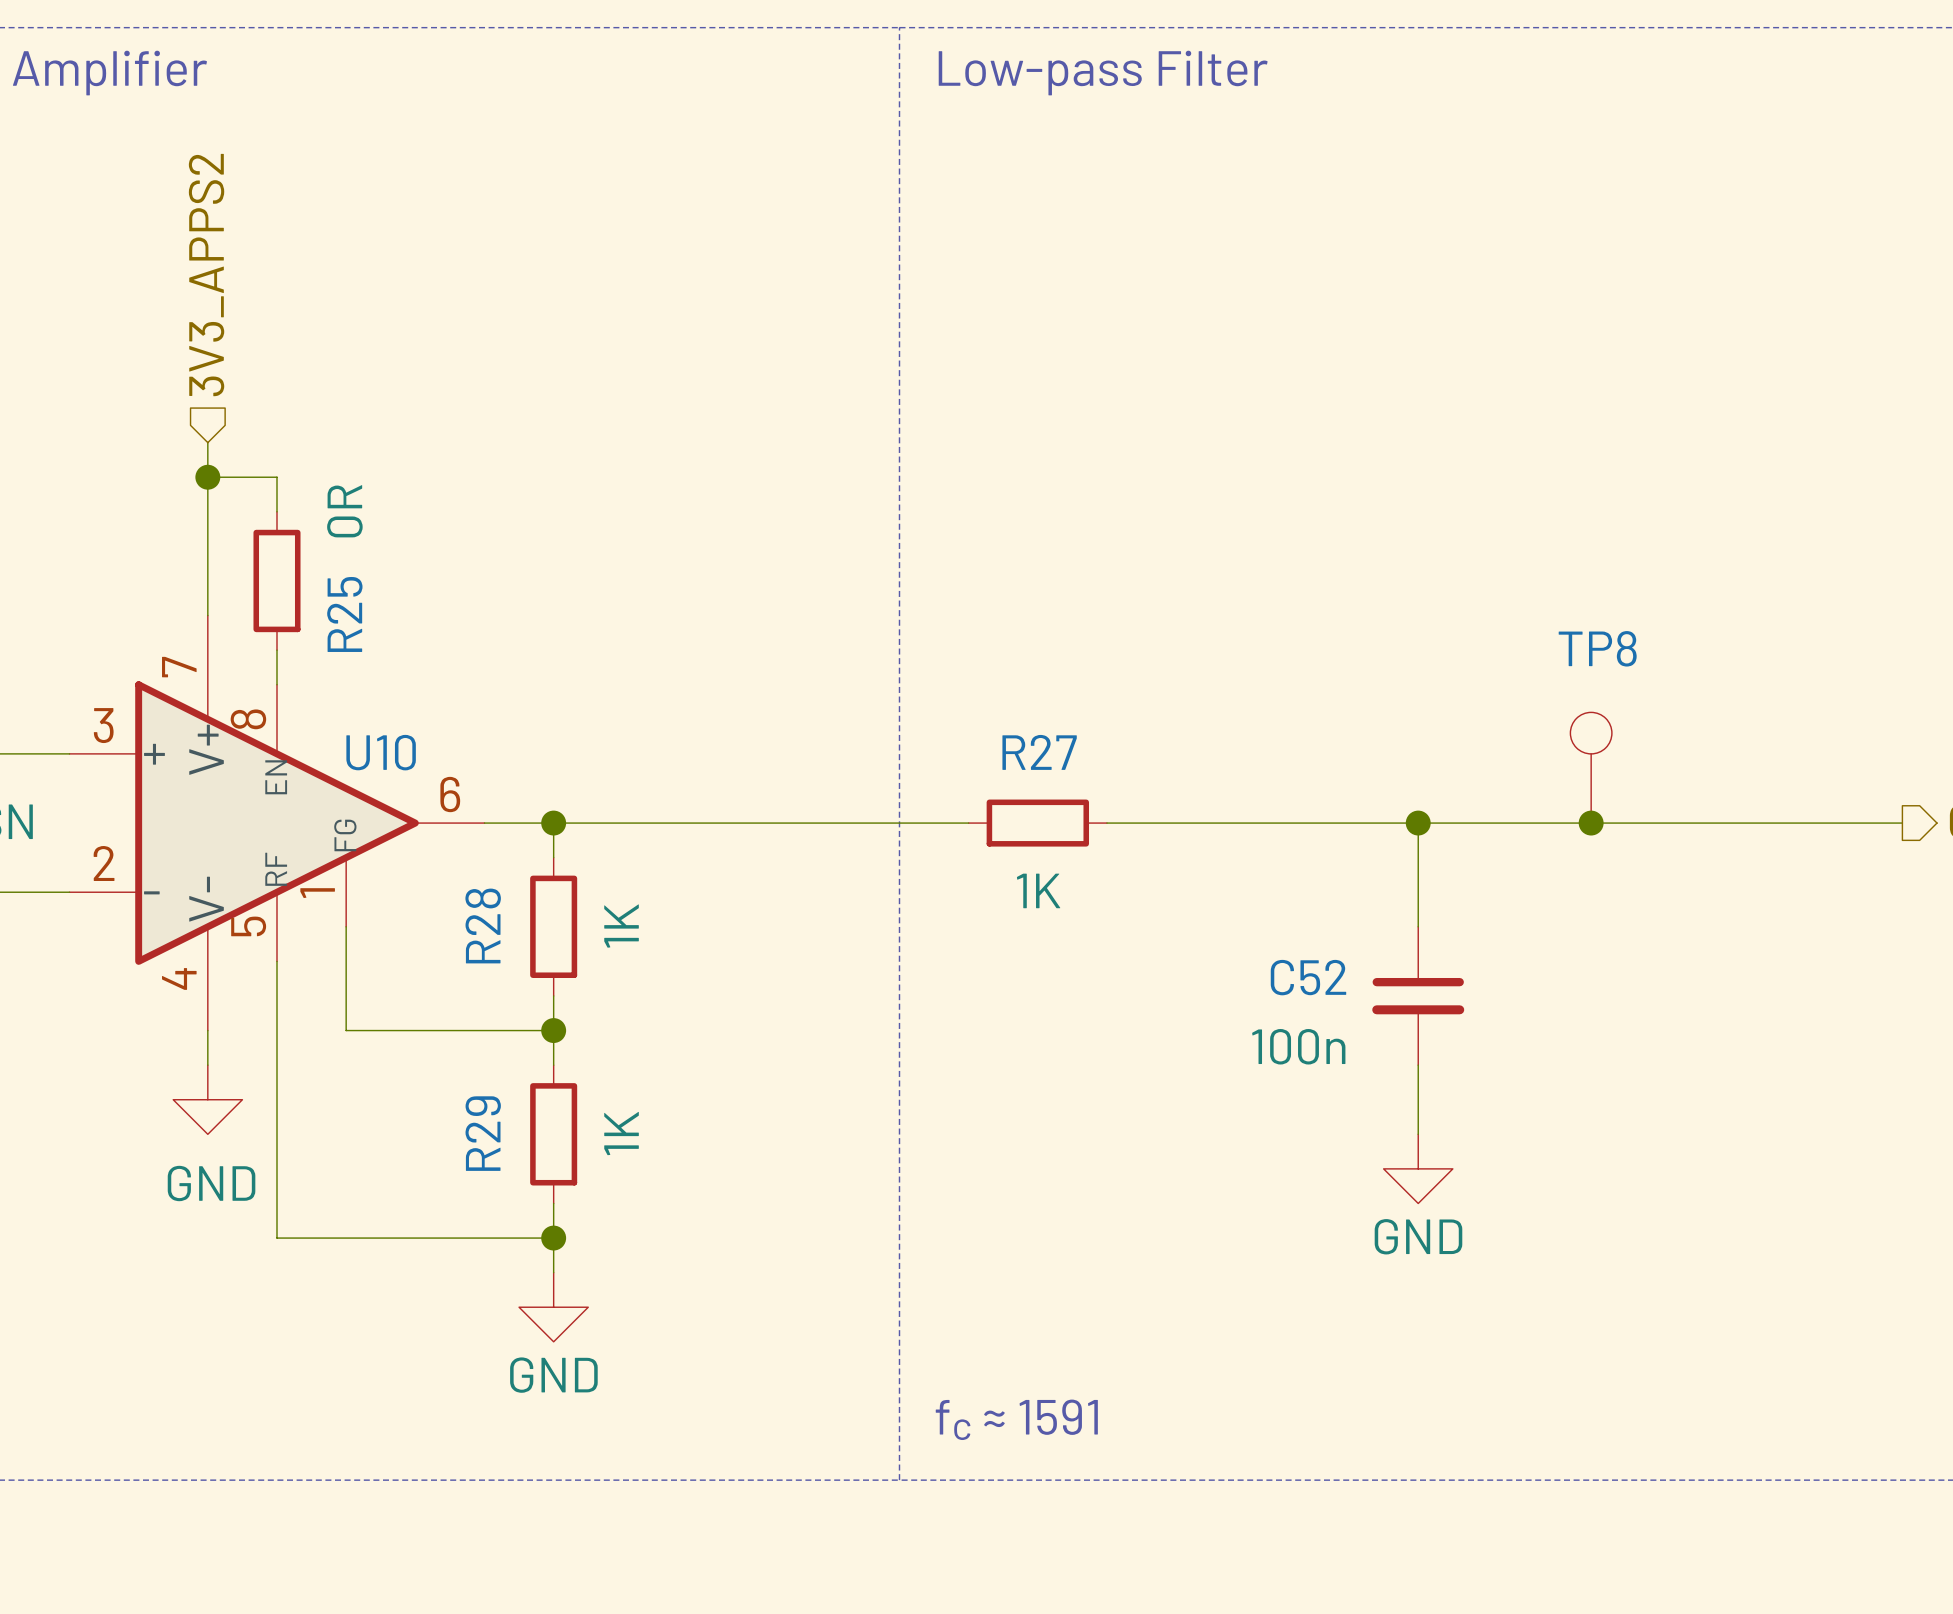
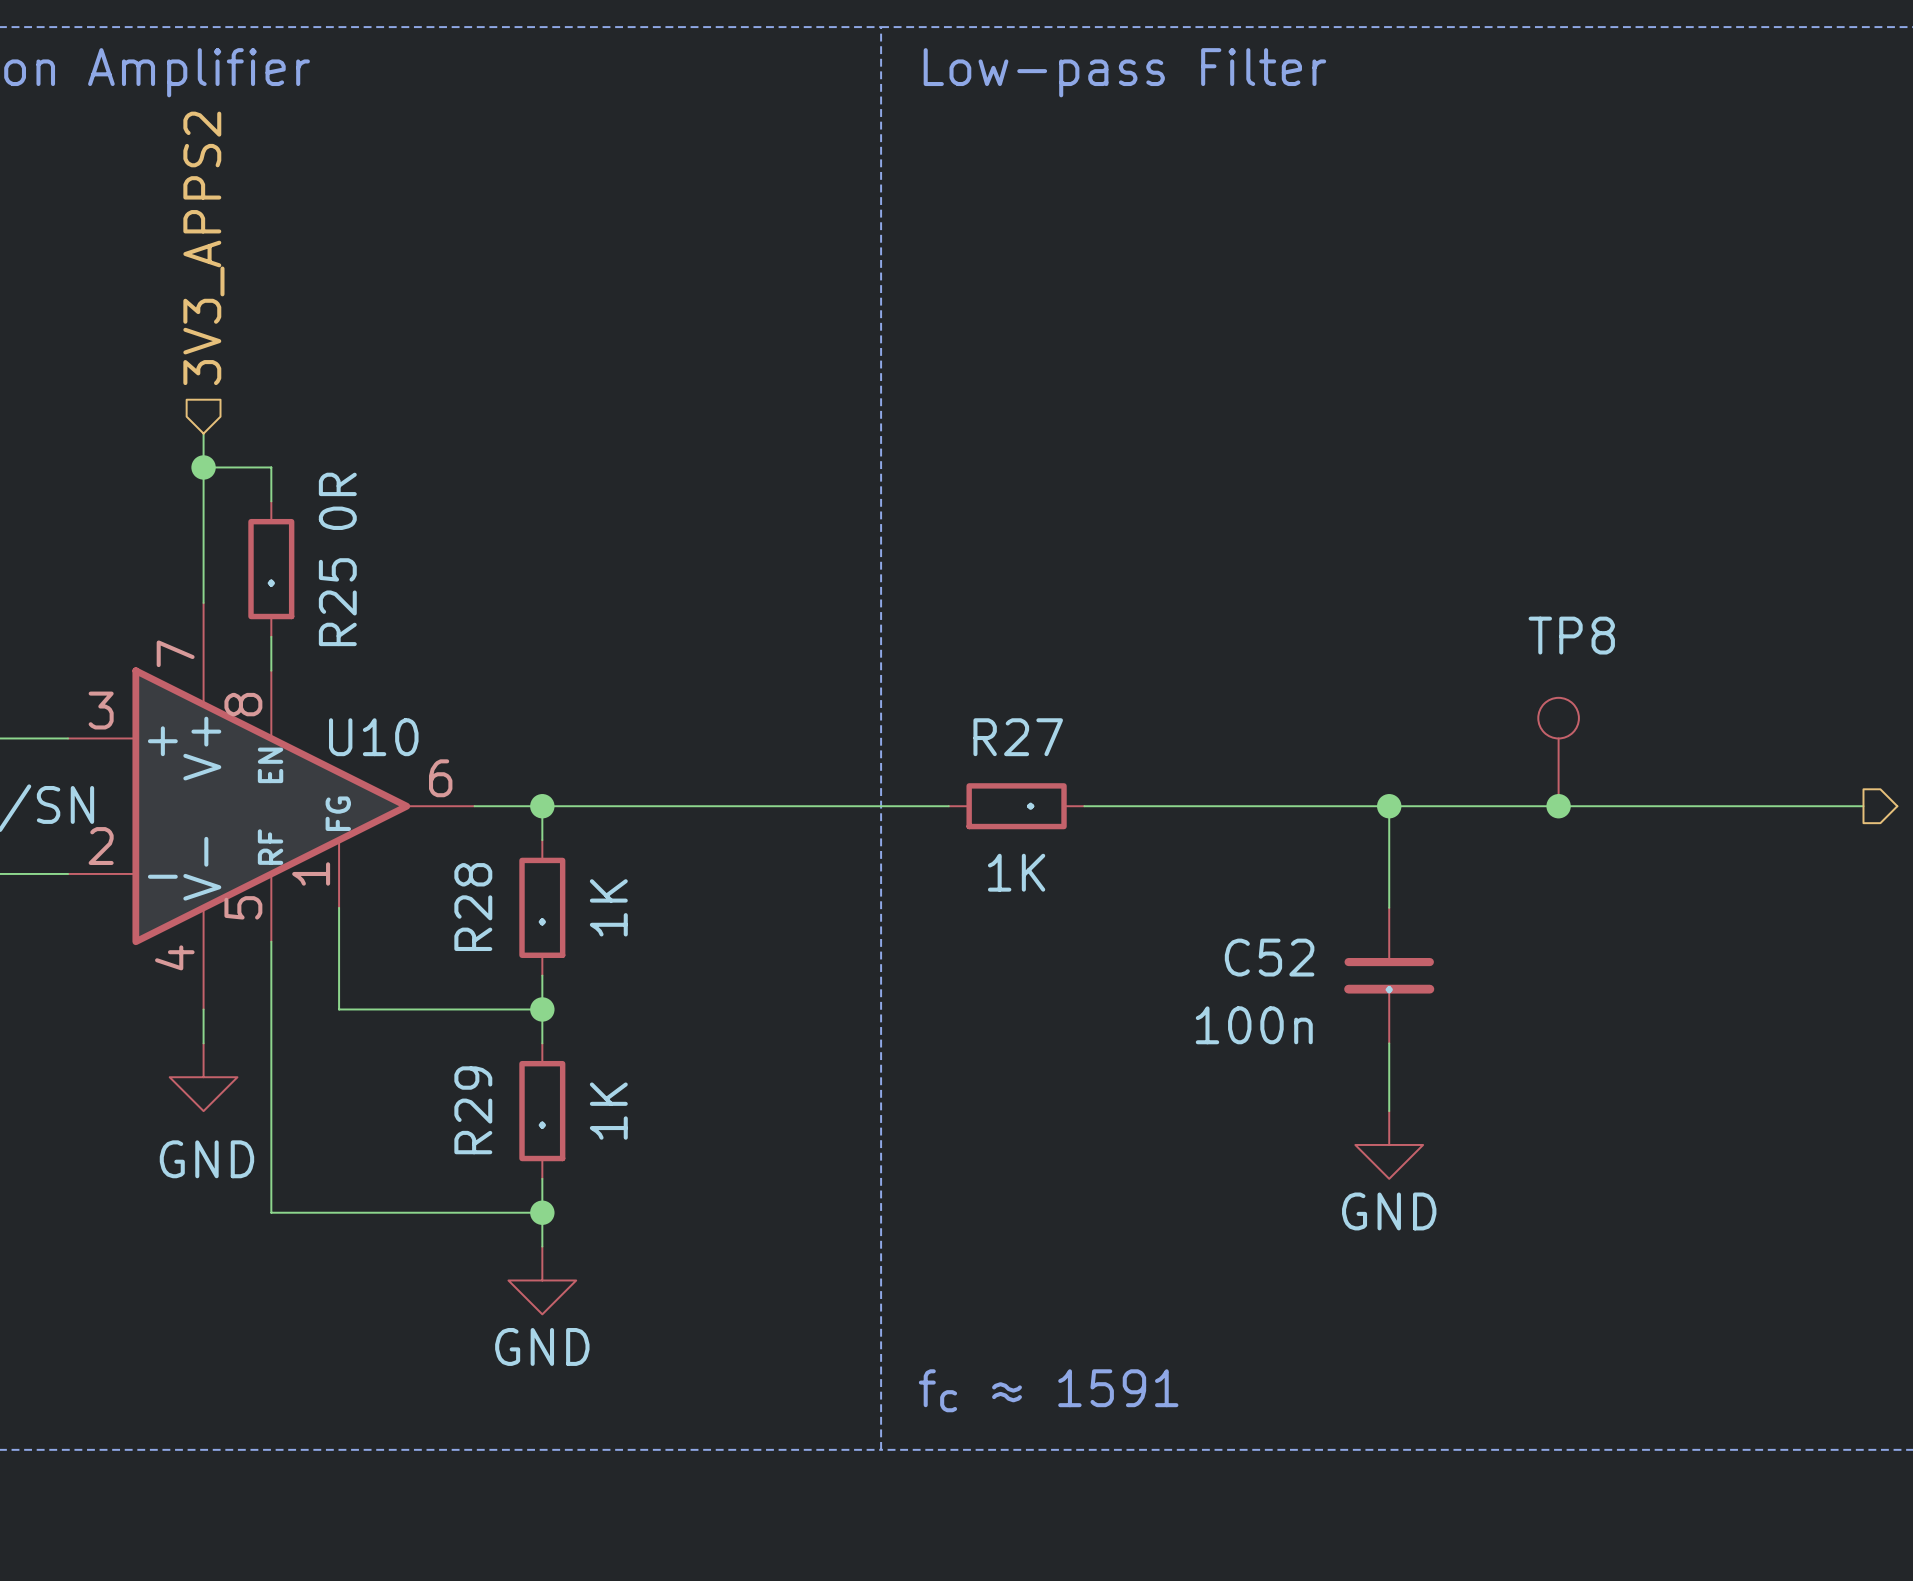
R25 text: none -> . (271, 583)
R27 text: none -> . (1030, 806)
R28 text: none -> . (542, 921)
C52 text: none -> . (1389, 989)
R29 text: none -> . (542, 1125)

